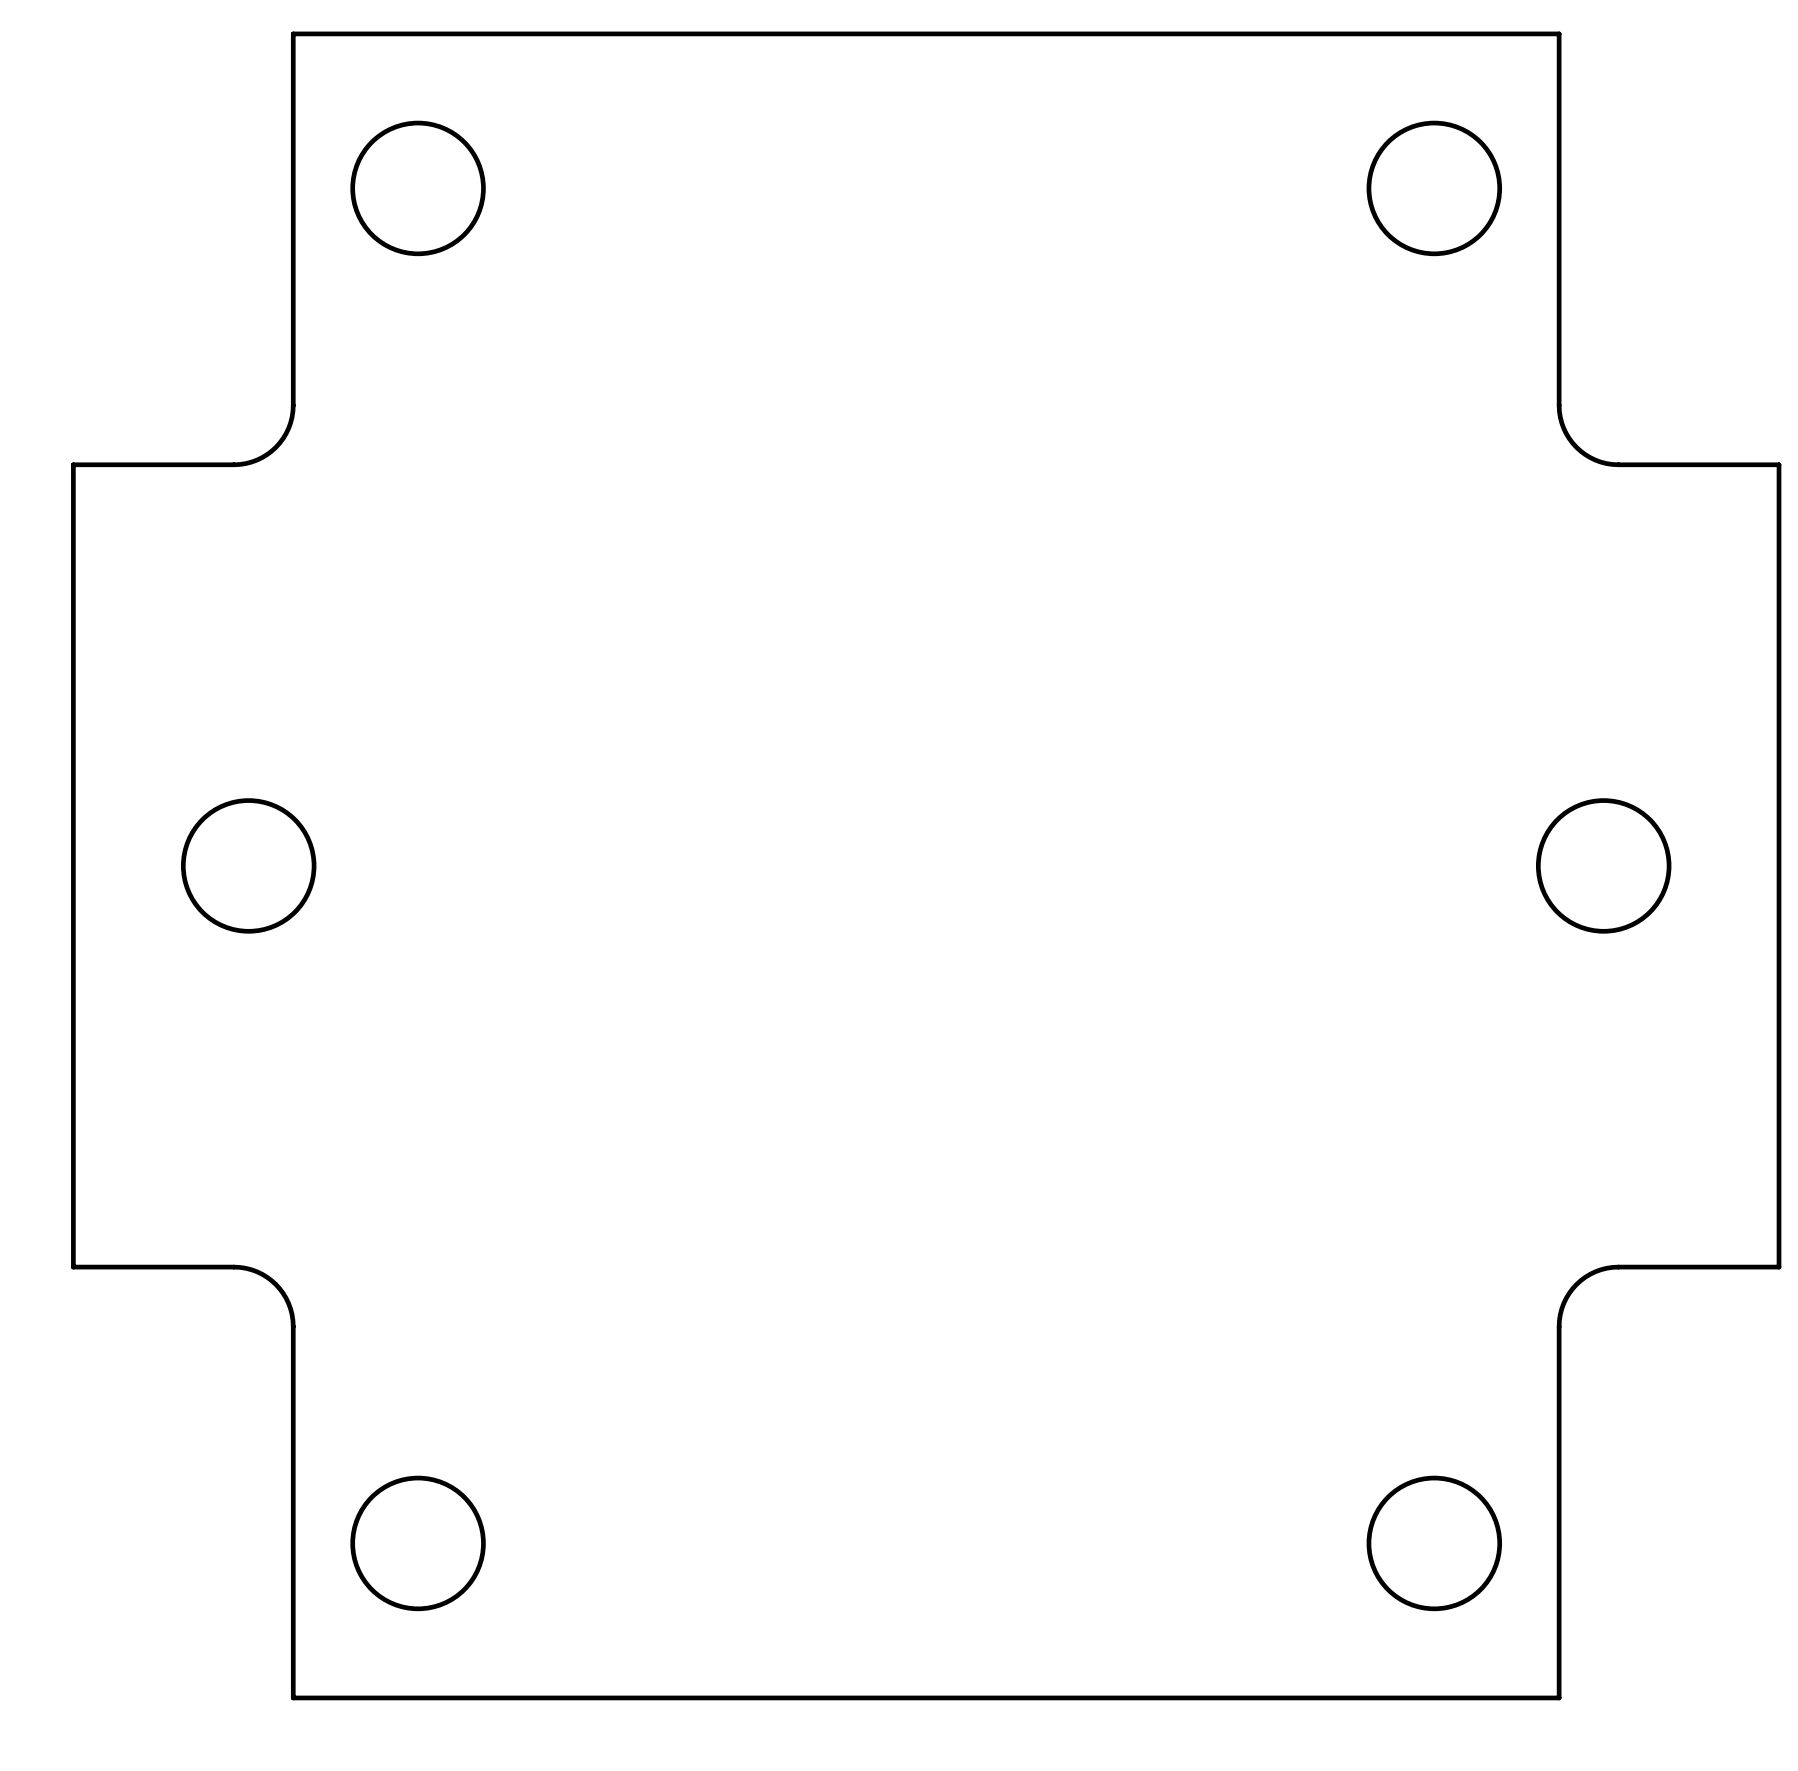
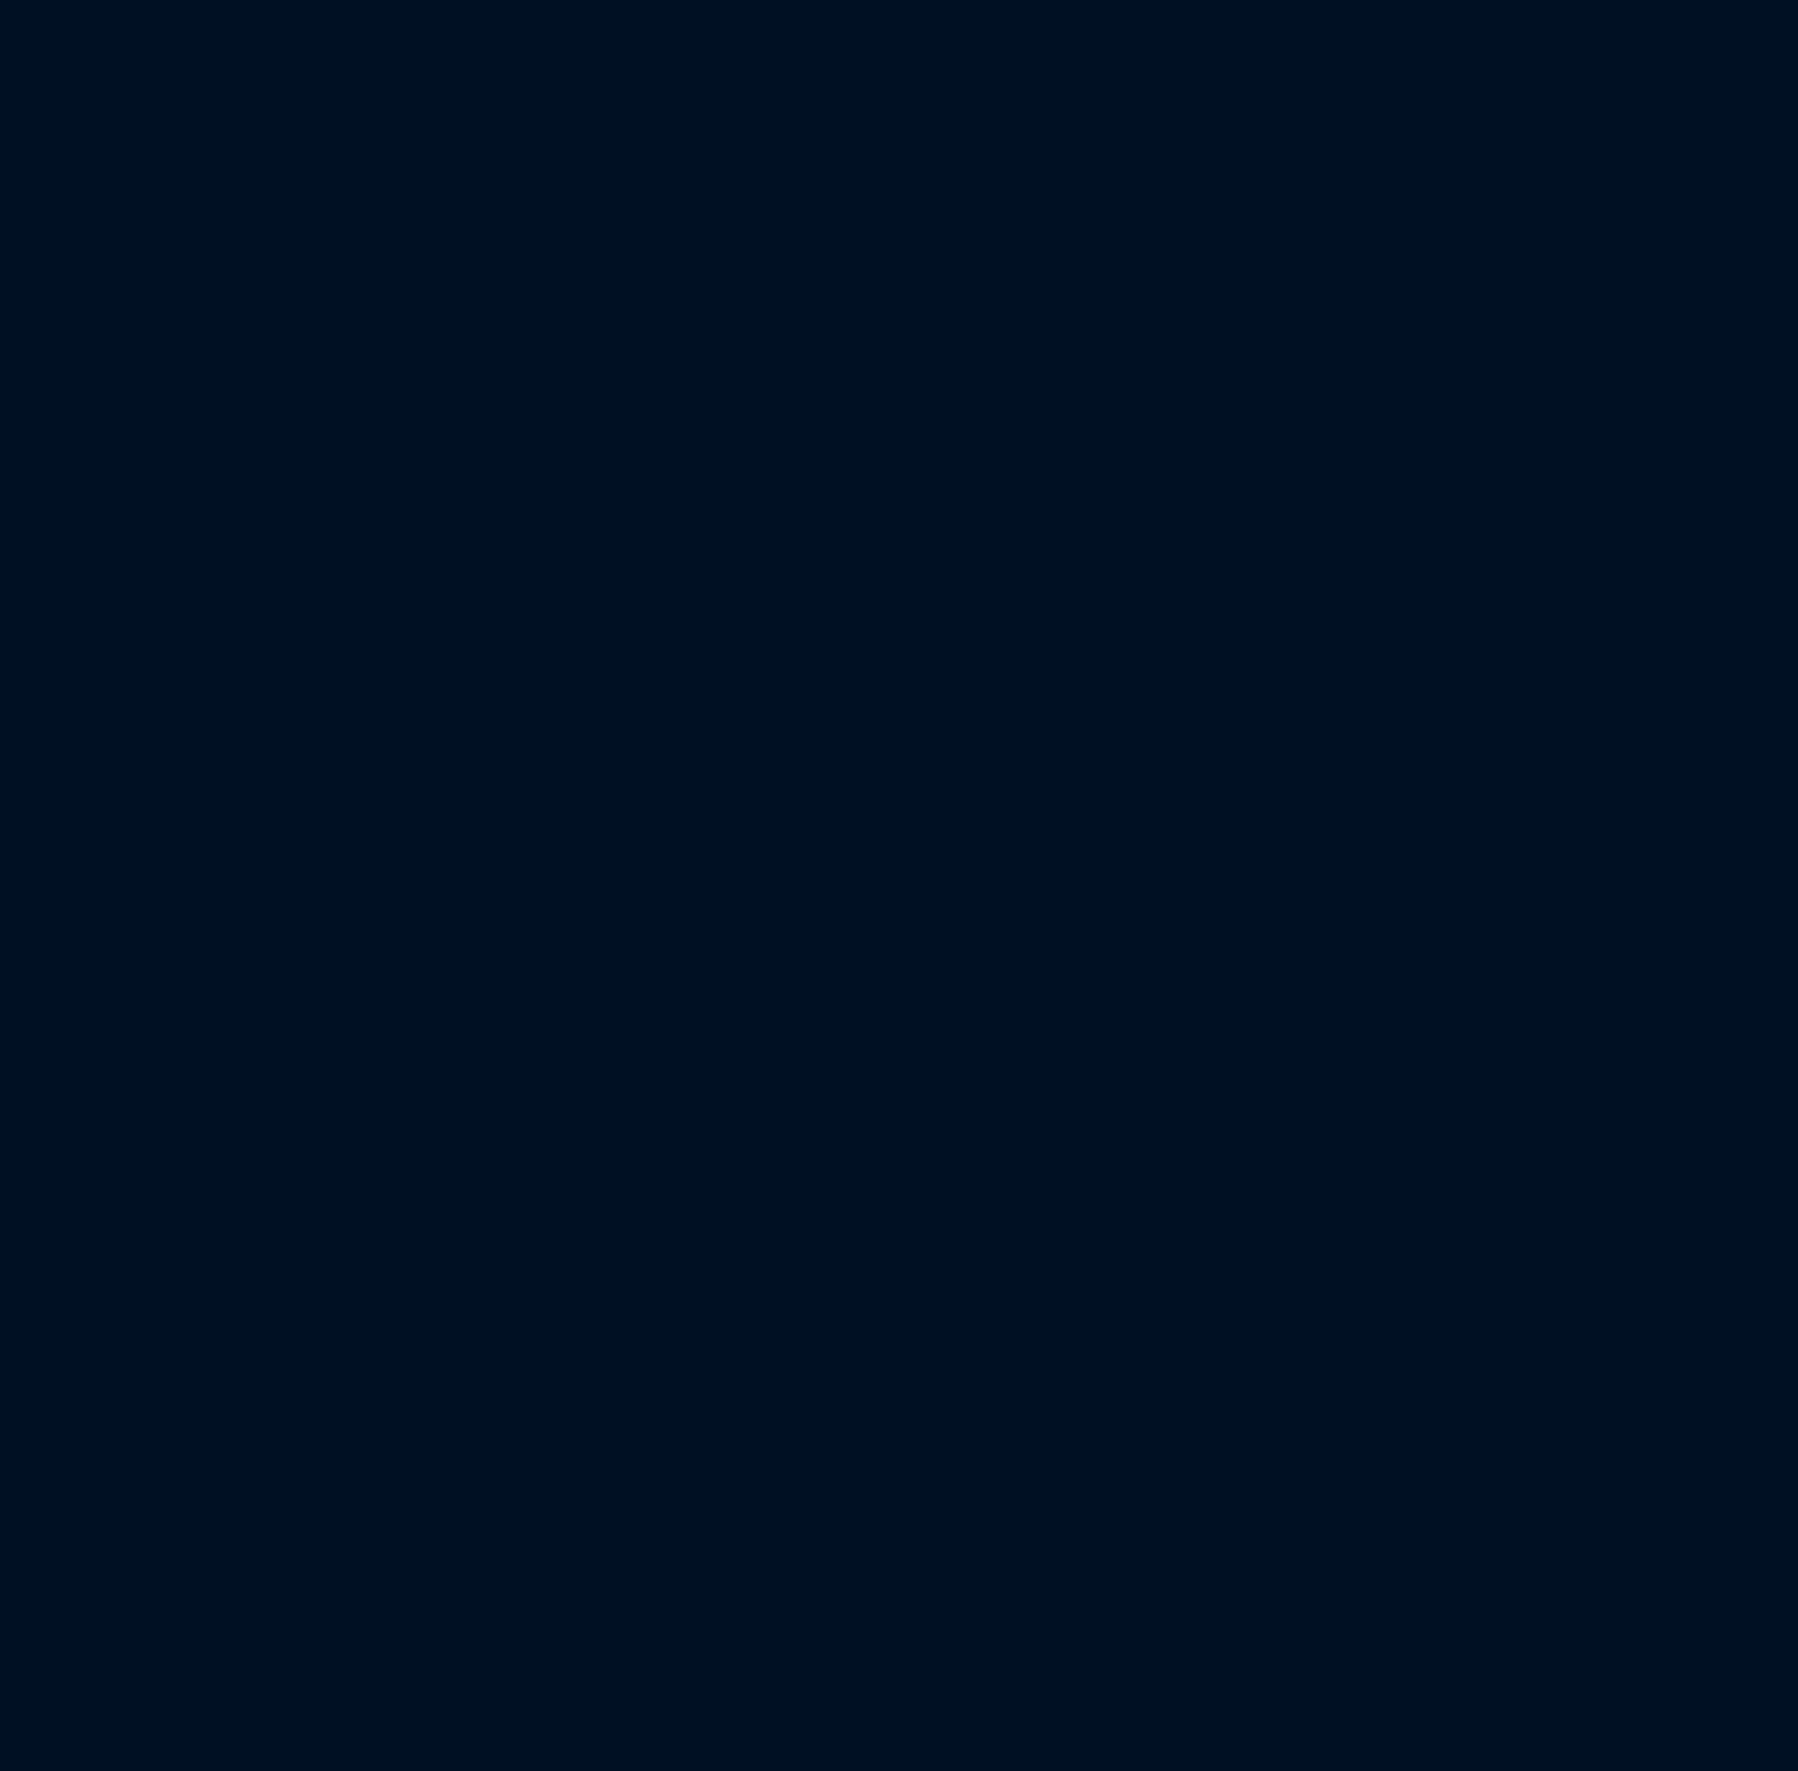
board edge: (293, 33) (1559, 33) (1559, 405) (1560, 417) (1566, 433) (1572, 443) (1585, 454) (1600, 462) (1612, 464) (1779, 464) (1779, 1267) (1612, 1267) (1600, 1269) (1585, 1277) (1572, 1288) (1566, 1298) (1560, 1314) (1559, 1326) (1559, 1697) (293, 1697) (293, 1326) (292, 1314) (286, 1298) (279, 1288) (267, 1277) (251, 1269) (239, 1267) (73, 1267) (73, 464) (239, 464) (251, 462) (267, 454) (279, 443) (286, 433) (292, 417) (293, 405) (293, 33) -> none
round board edge: [350, 120, 486, 257] -> none
round board edge: [1366, 120, 1503, 257] -> none
round board edge: [180, 798, 317, 934] -> none
round board edge: [1535, 798, 1672, 934] -> none
round board edge: [350, 1475, 486, 1612] -> none
round board edge: [1366, 1475, 1503, 1612] -> none

